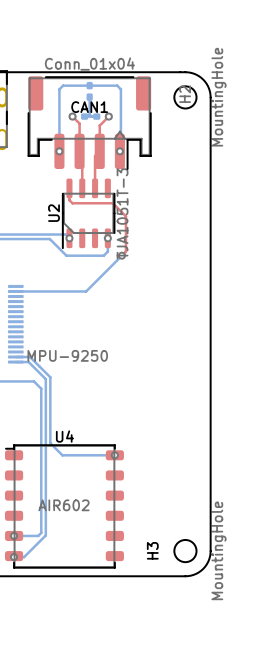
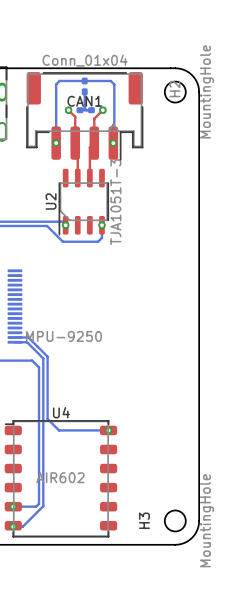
top track: (69, 188) (69, 200) (72, 203) (112, 203) (125, 216) (125, 251) (121, 255) -> none
bottom track: (121, 255) (86, 291) (15, 291) -> none
via: (121, 255) -> none

